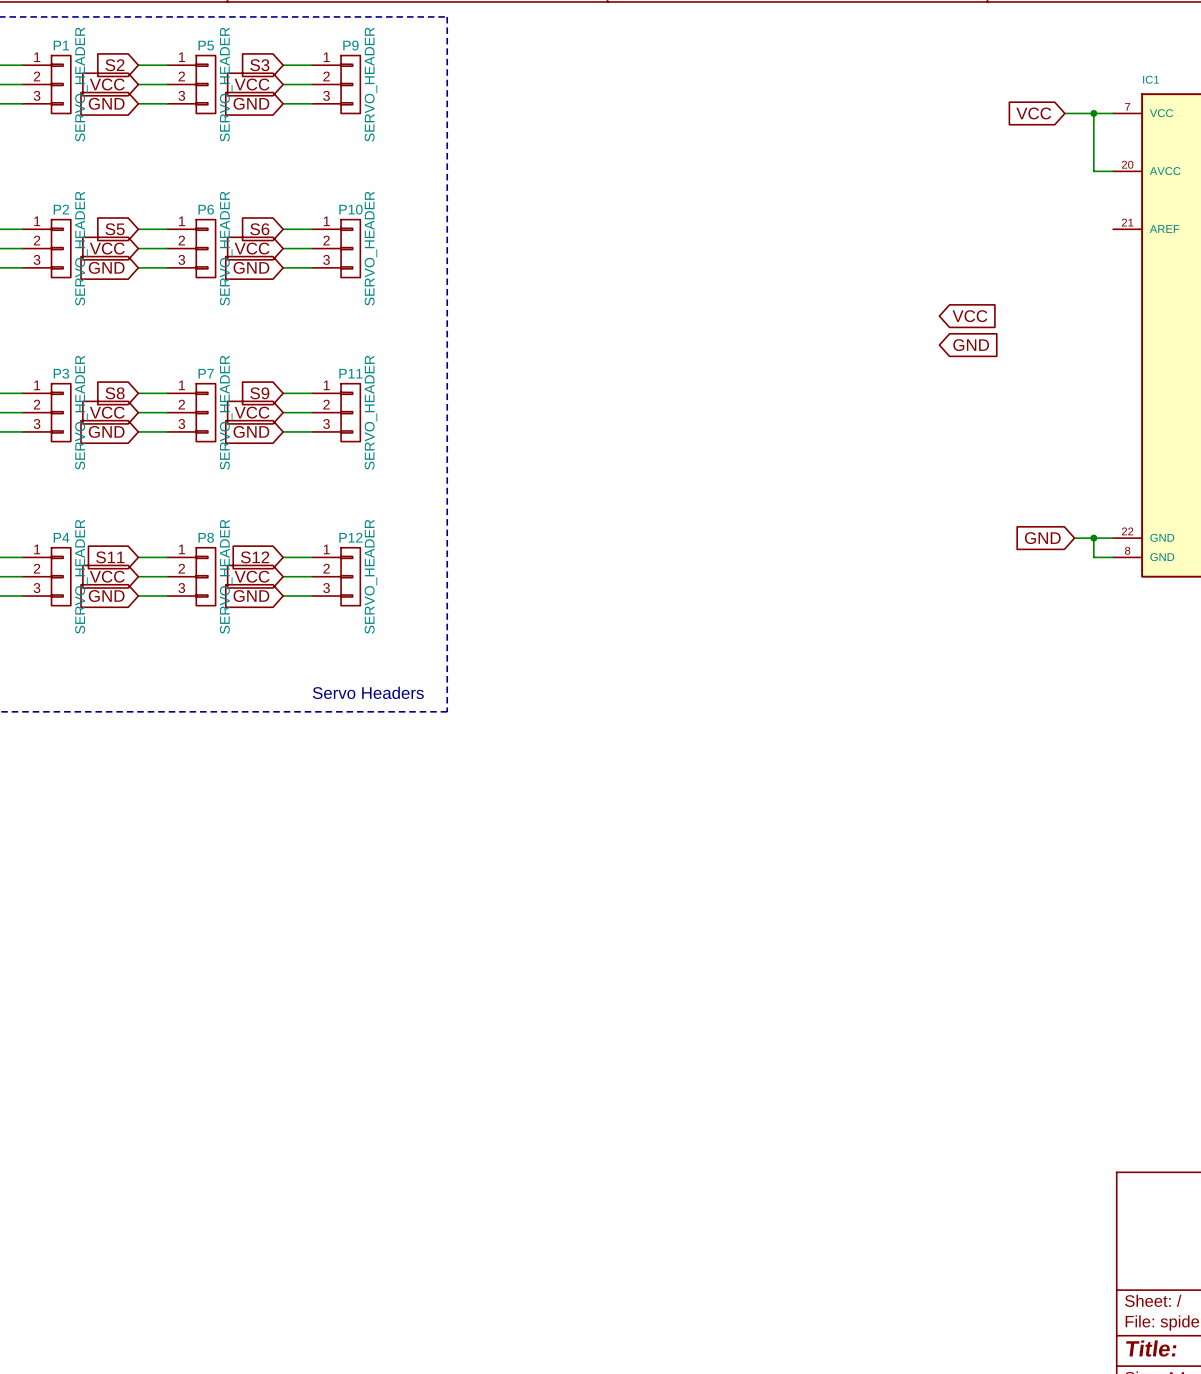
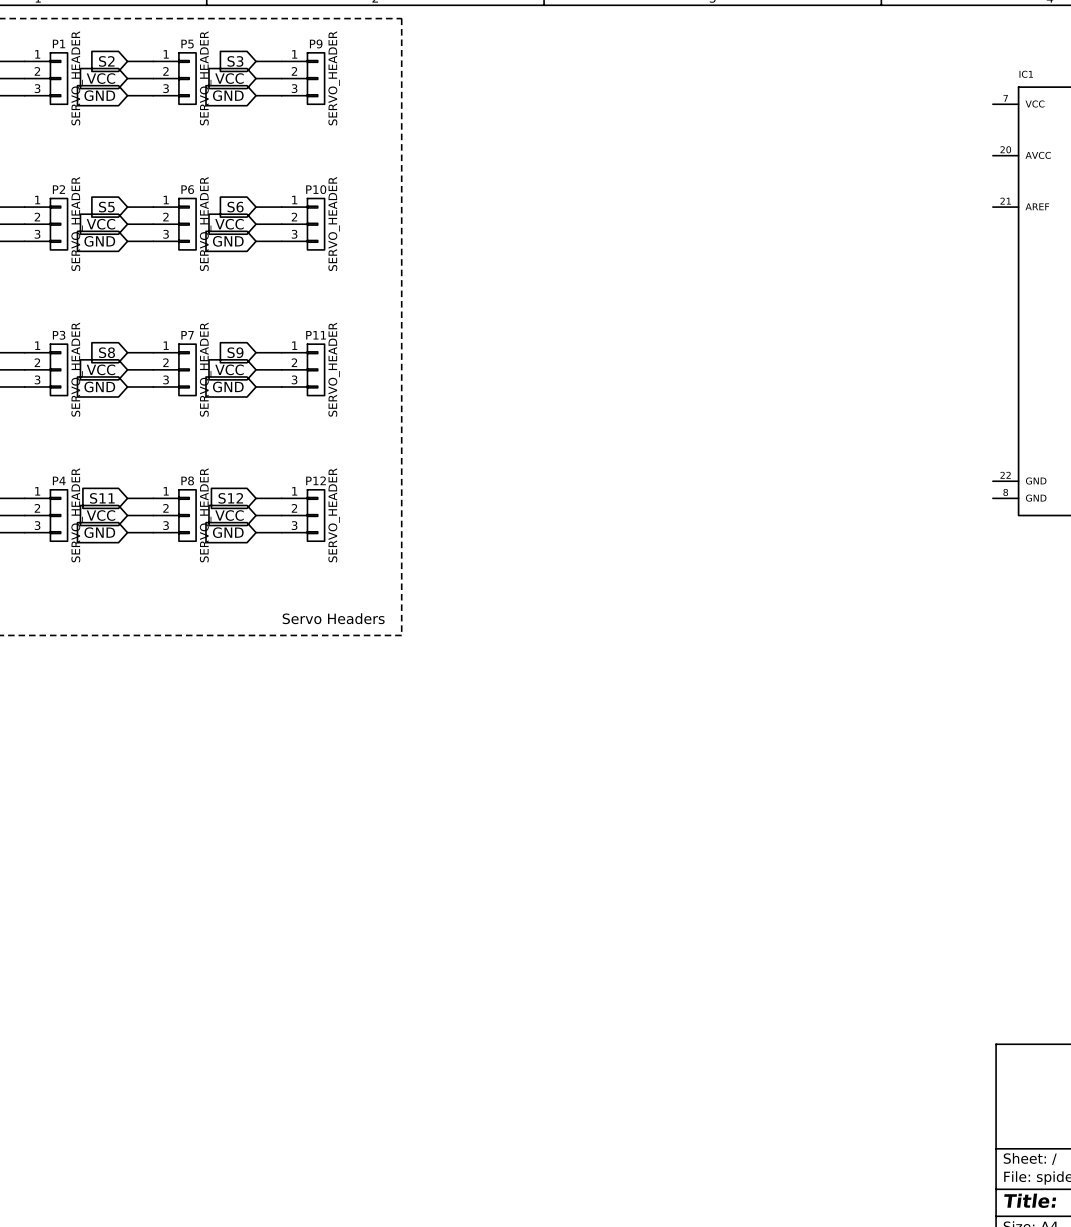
global label: VCC (1033, 113) -> none
wire: (1064, 113) (1113, 113) -> none
wire: (1093, 113) (1093, 171) (1113, 171) -> none
junction: (1093, 113) -> none
global label: VCC (969, 316) -> none
global label: GND (971, 345) -> none
global label: GND (1042, 538) -> none
wire: (1074, 538) (1113, 538) -> none
wire: (1093, 538) (1093, 557) (1113, 557) -> none
junction: (1093, 538) -> none

